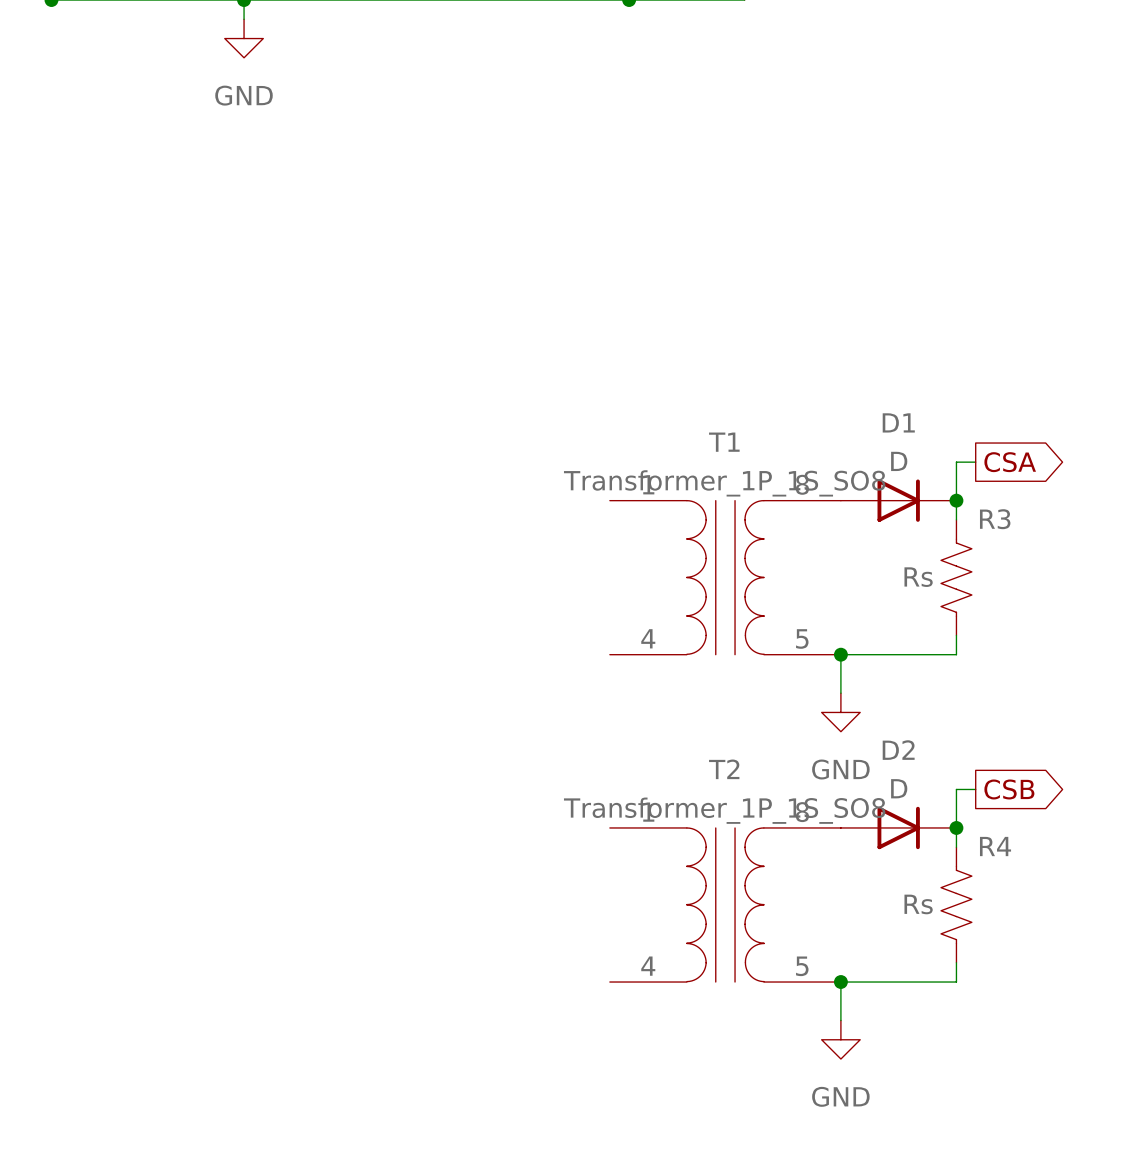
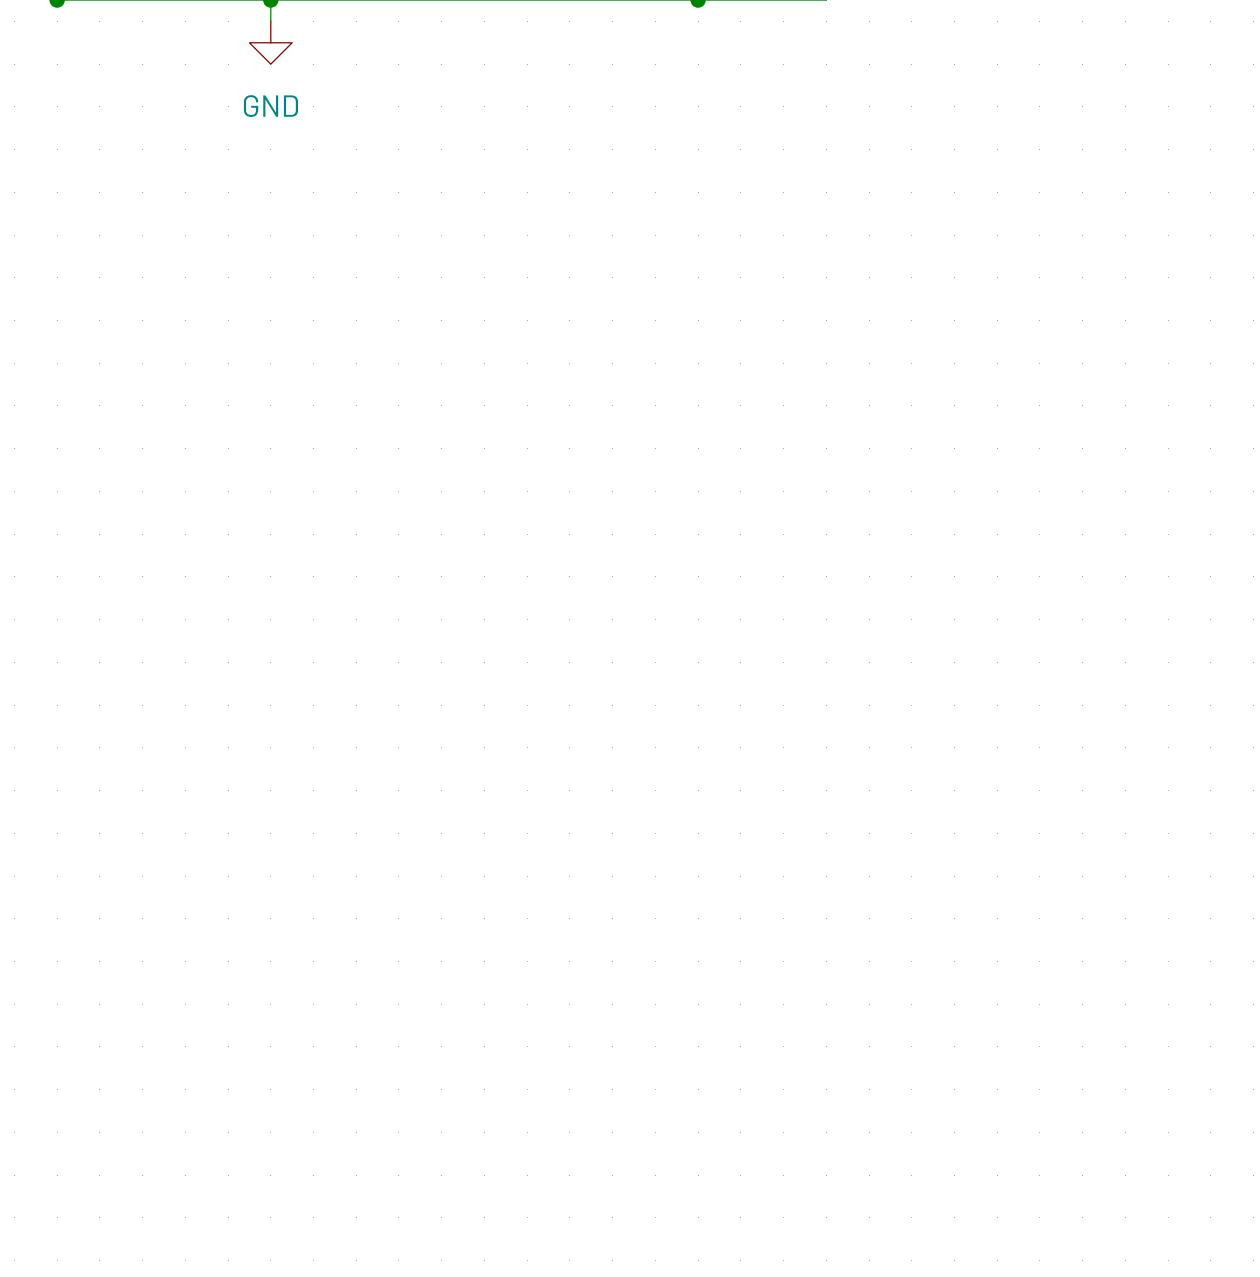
wire: (975, 462) (956, 462) (956, 519) -> none
global label: CSA (1010, 462) -> none
D1: D (898, 500) -> none
junction: (956, 500) -> none
T1: Transformer_1P_1S_SO8 (725, 577) -> none
R3: Rs (956, 577) -> none
wire: (956, 635) (956, 654) (840, 654) (840, 693) -> none
junction: (840, 654) -> none
power symbol: GND (840, 712) -> none
wire: (975, 789) (956, 789) (956, 847) -> none
global label: CSB (1009, 789) -> none
D2: D (898, 827) -> none
junction: (956, 827) -> none
T2: Transformer_1P_1S_SO8 (725, 904) -> none
R4: Rs (956, 904) -> none
wire: (956, 962) (956, 982) (840, 982) (840, 1020) -> none
junction: (840, 982) -> none
power symbol: GND (840, 1039) -> none

